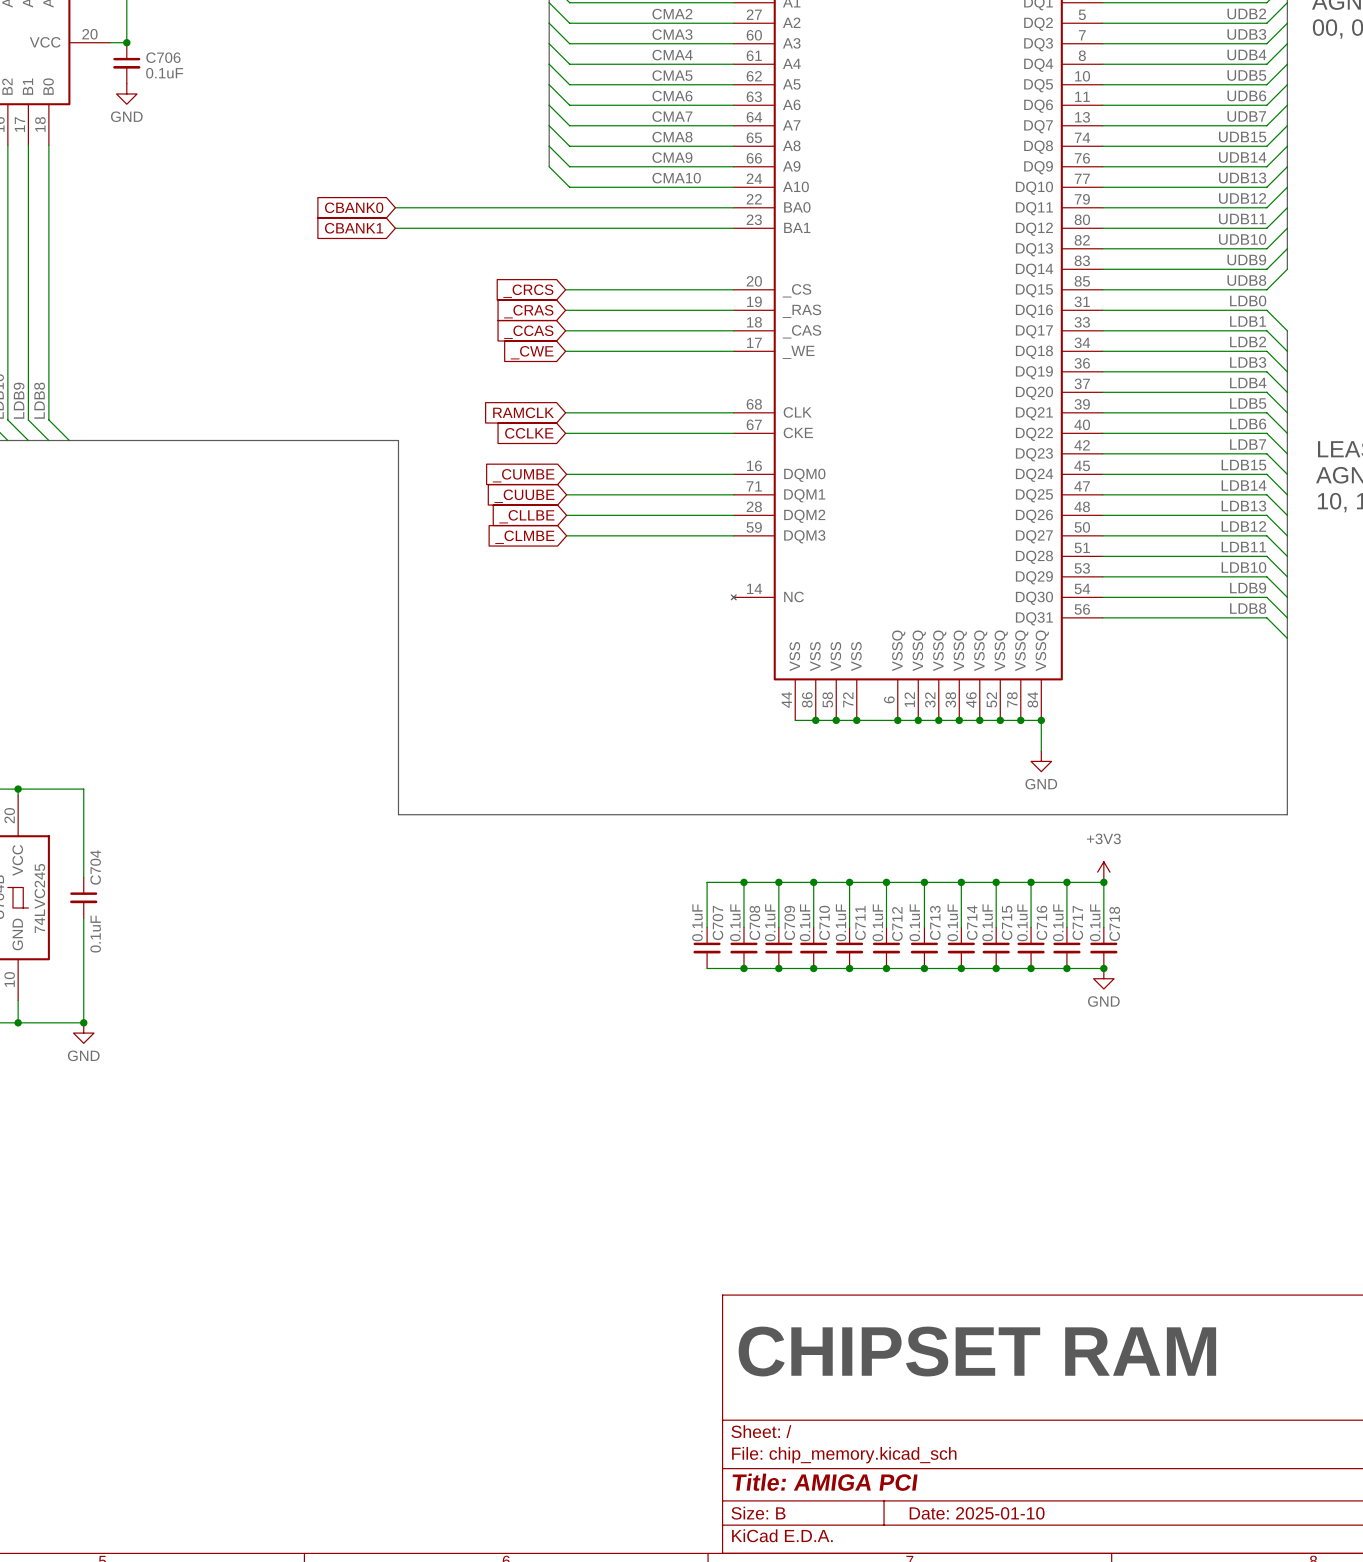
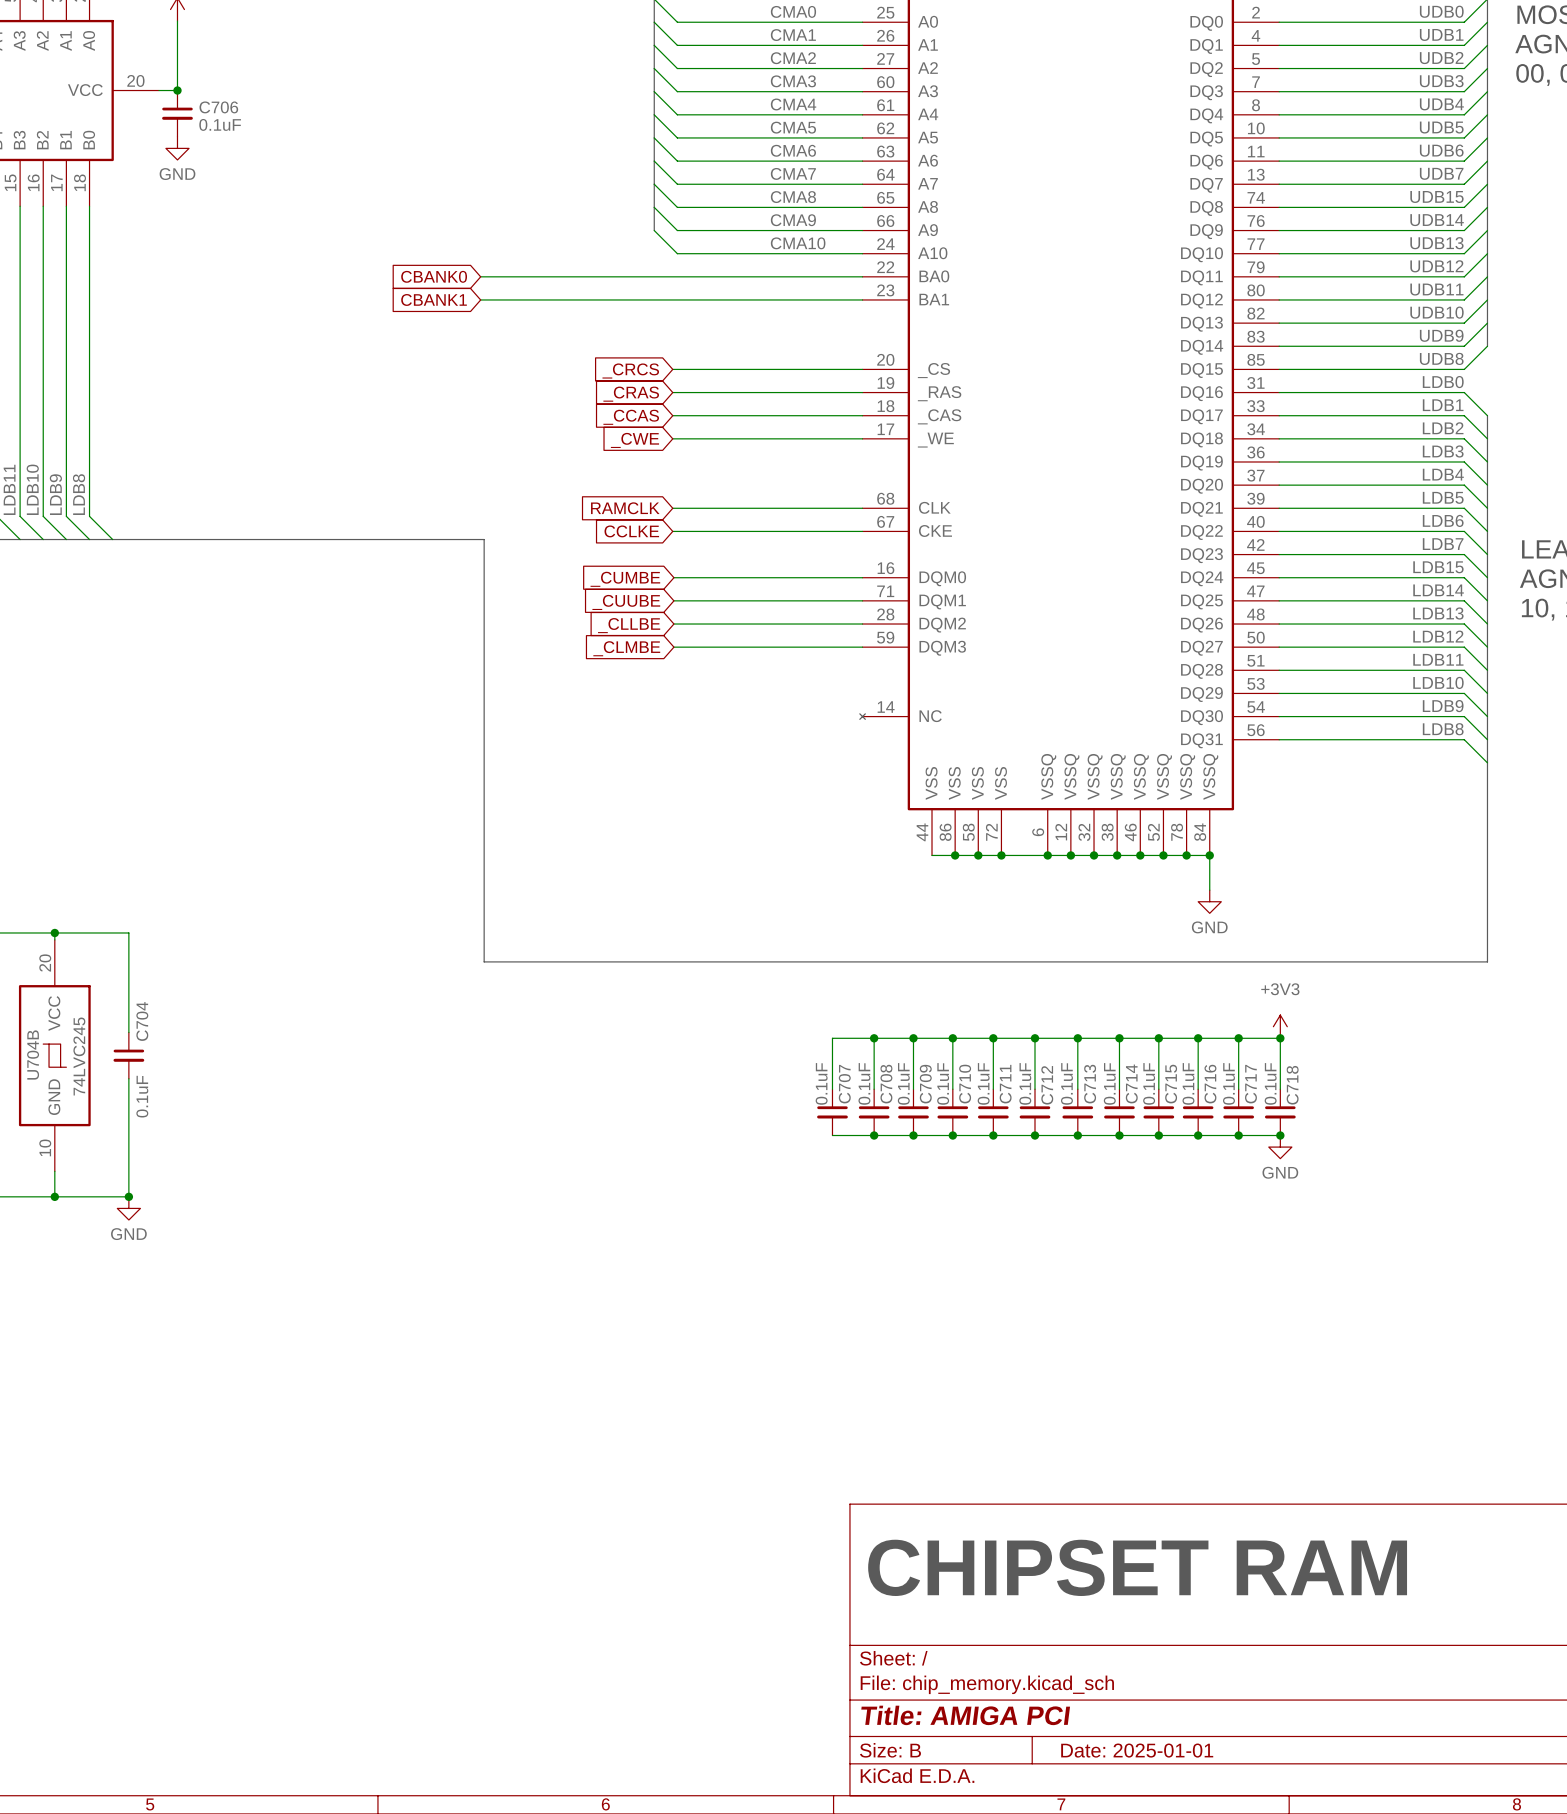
title block: Date: 2025-01-10 (977, 1513) -> Date: 2025-01-01 (1137, 1750)

